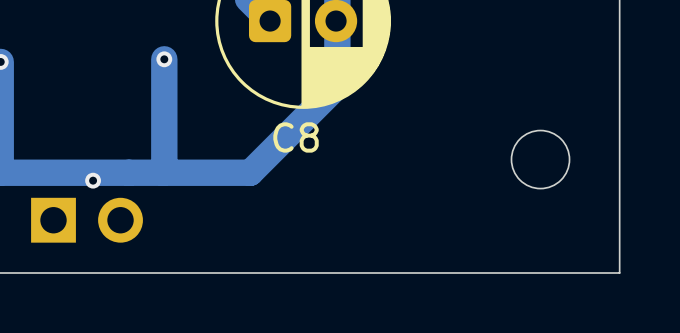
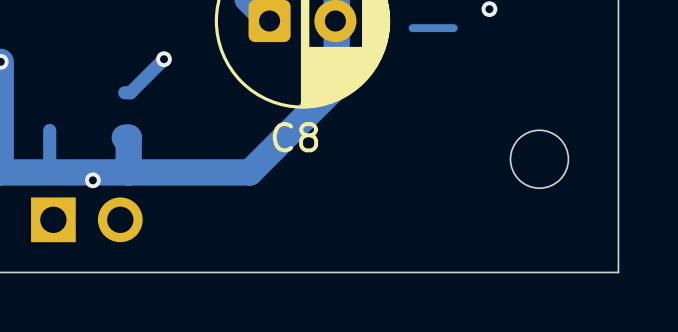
via: none -> (489, 9)
track: none -> (453, 28) (412, 28)
track: (164, 59) (163, 172) -> (163, 59) (130, 92) (124, 92)
track: none -> (49, 130) (49, 175)
track: none -> (124, 137) (128, 137) (128, 172)

